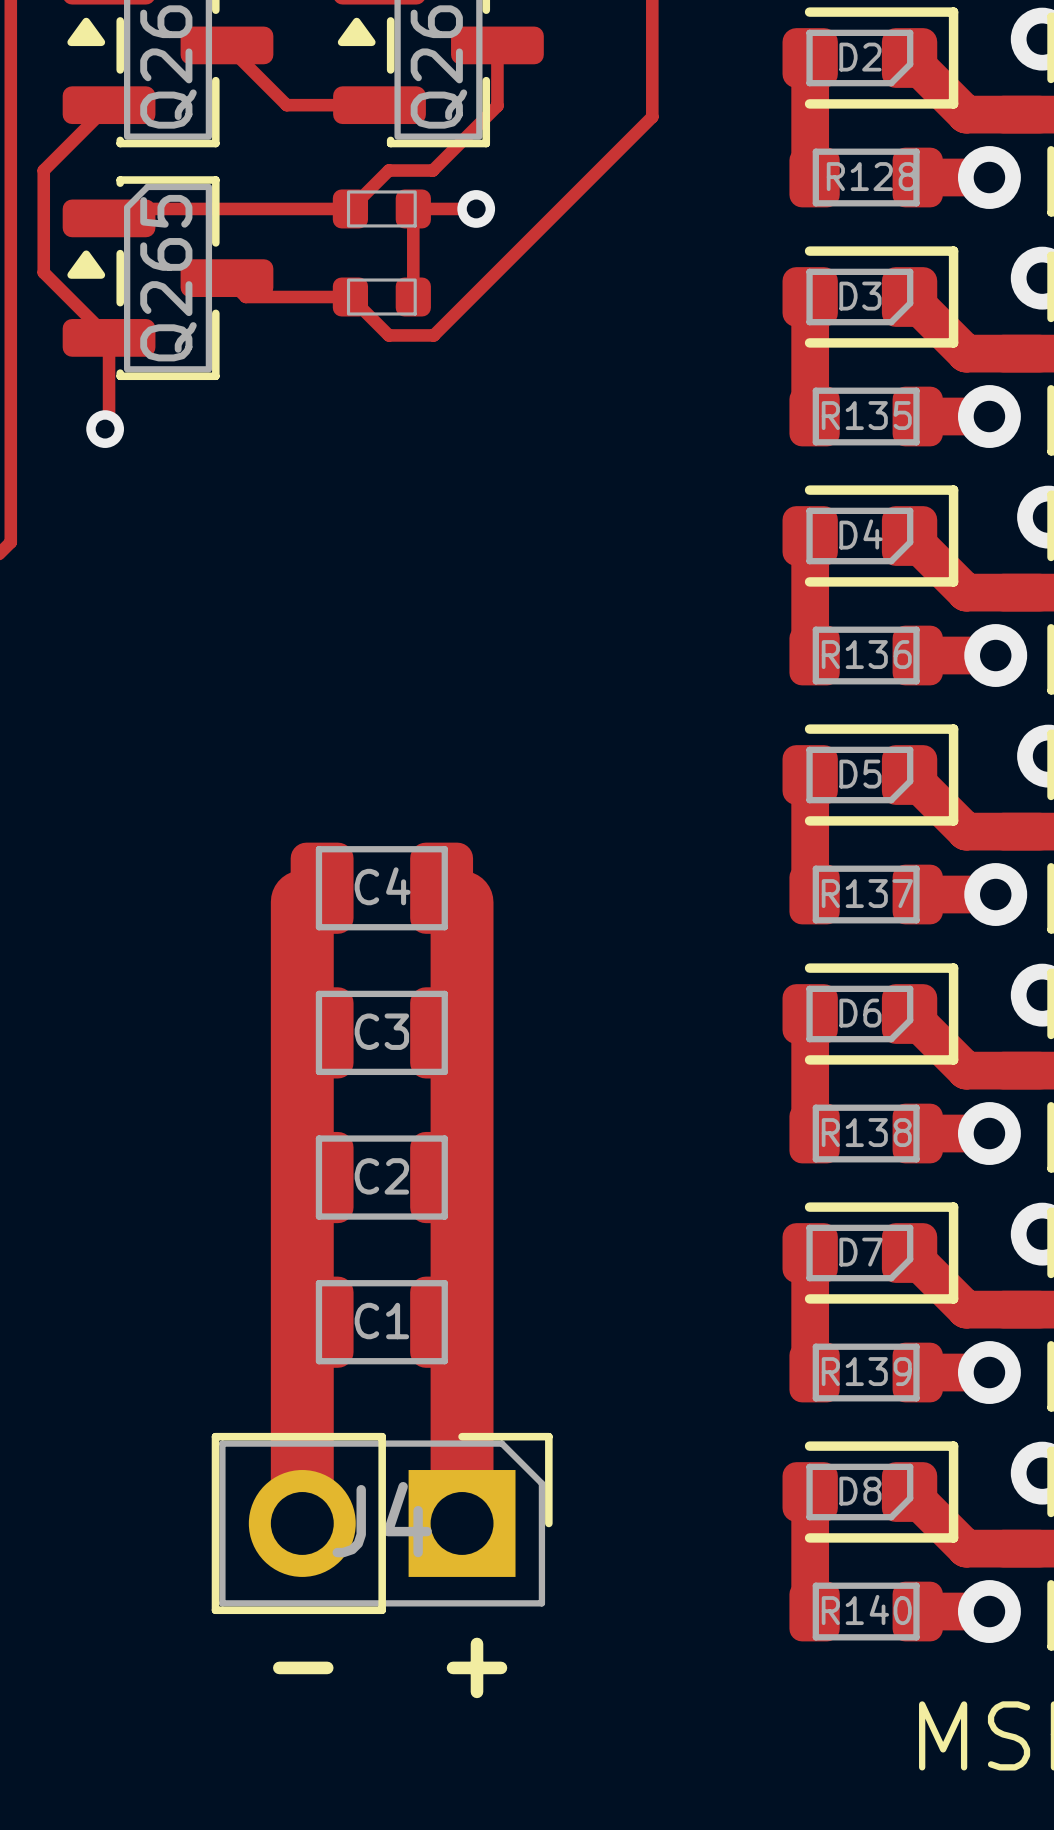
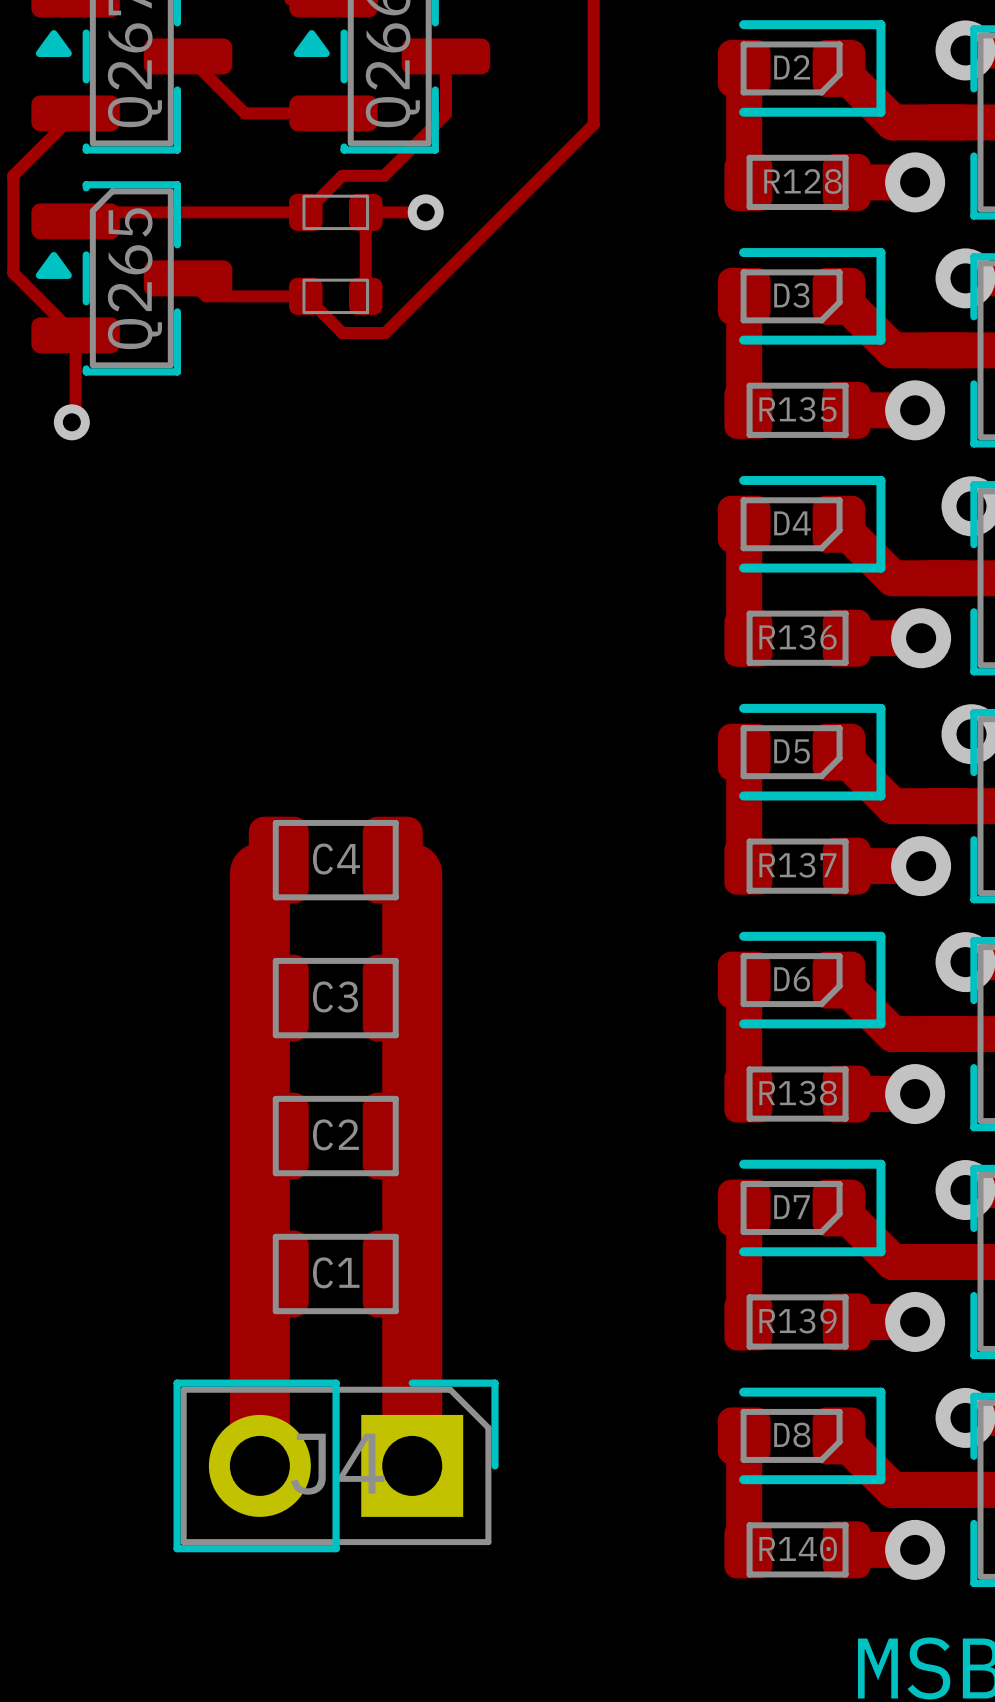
text: - + (390, 1667) -> none

